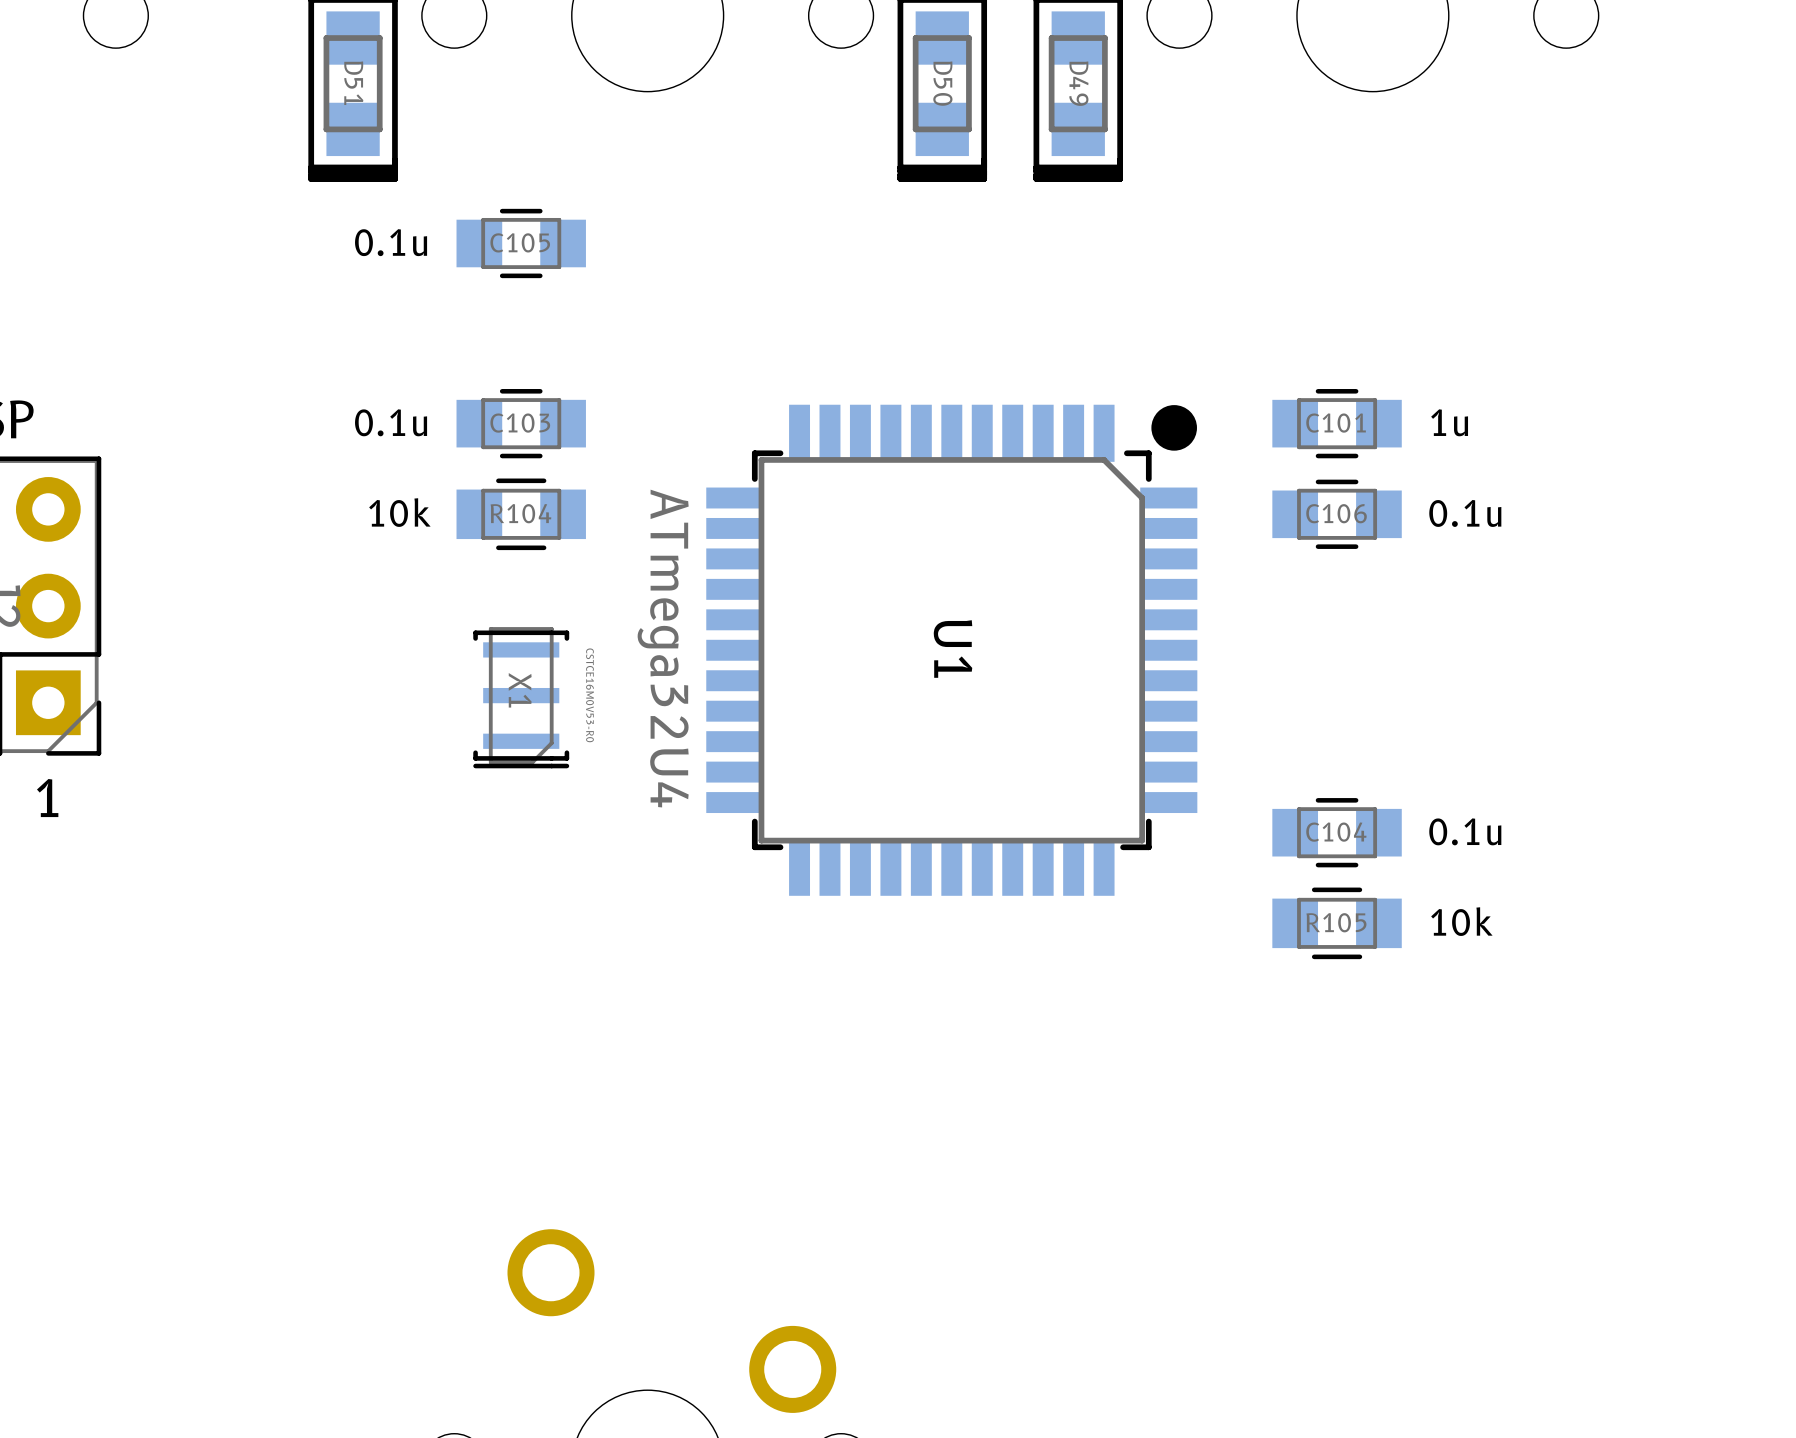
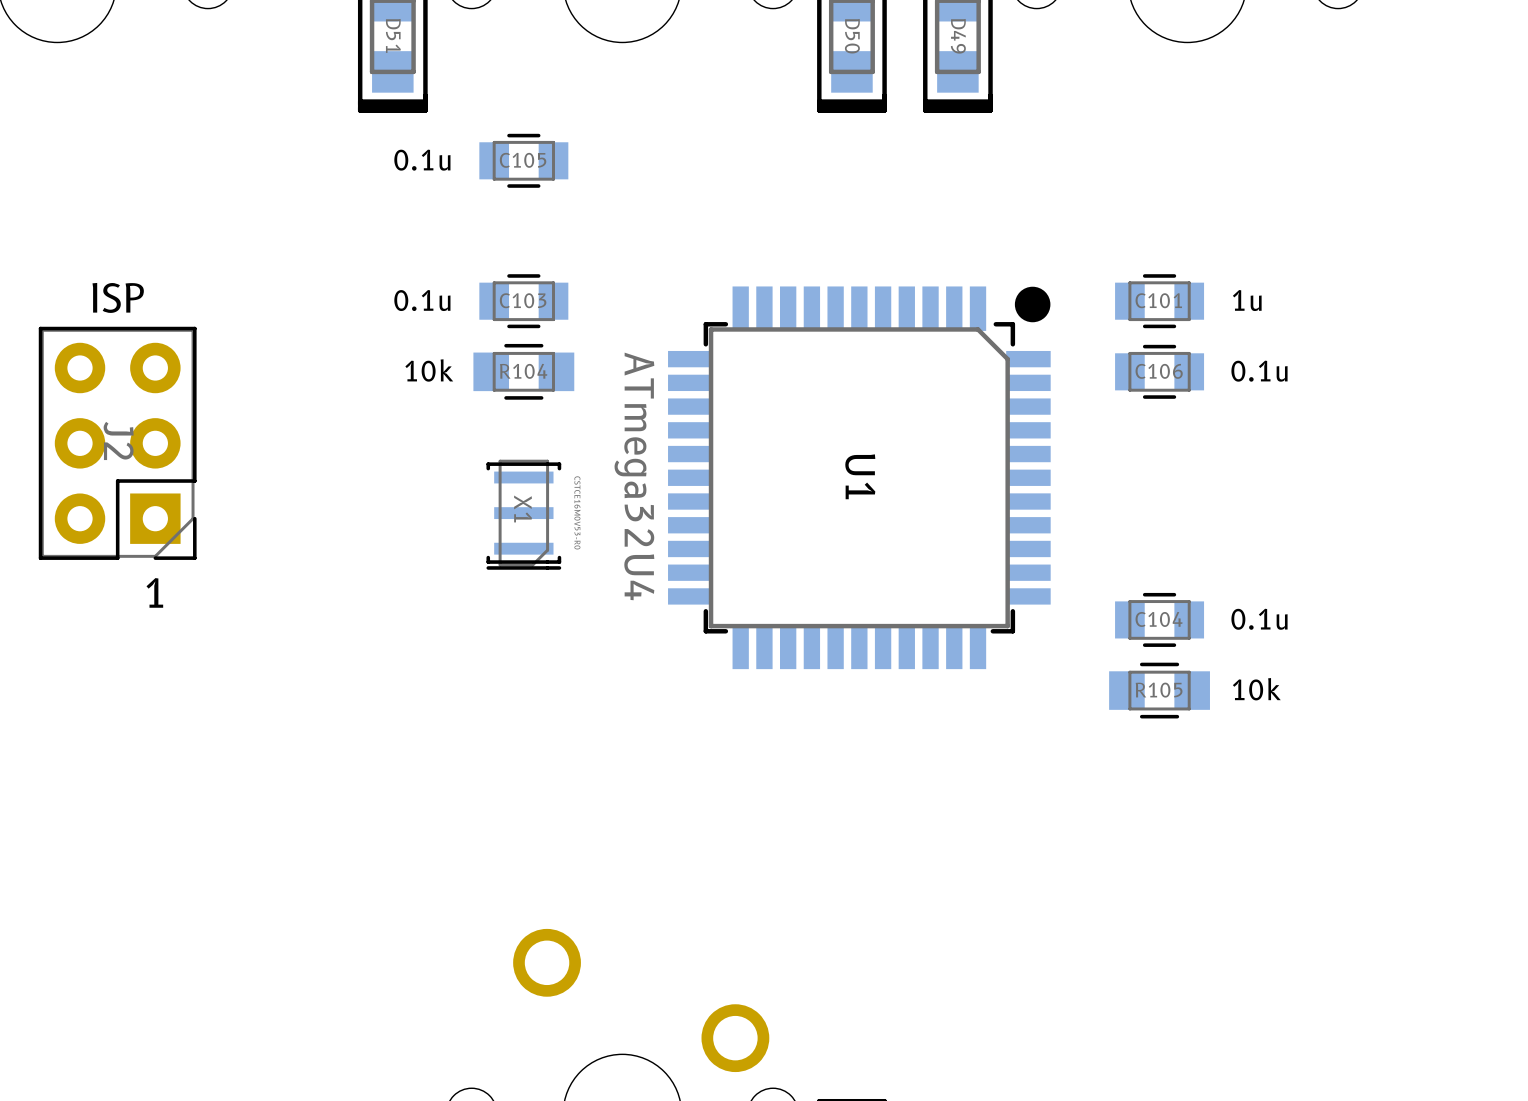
C105 footprint: [456, 208, 586, 279] -> [479, 133, 569, 188]
C103 footprint: [456, 389, 586, 459] -> [479, 274, 569, 329]
C101 footprint: [1272, 389, 1402, 459] -> [1115, 274, 1205, 329]
C106 footprint: [1272, 479, 1402, 549] -> [1115, 344, 1205, 399]
C104 footprint: [1272, 798, 1402, 868] -> [1115, 592, 1205, 647]

